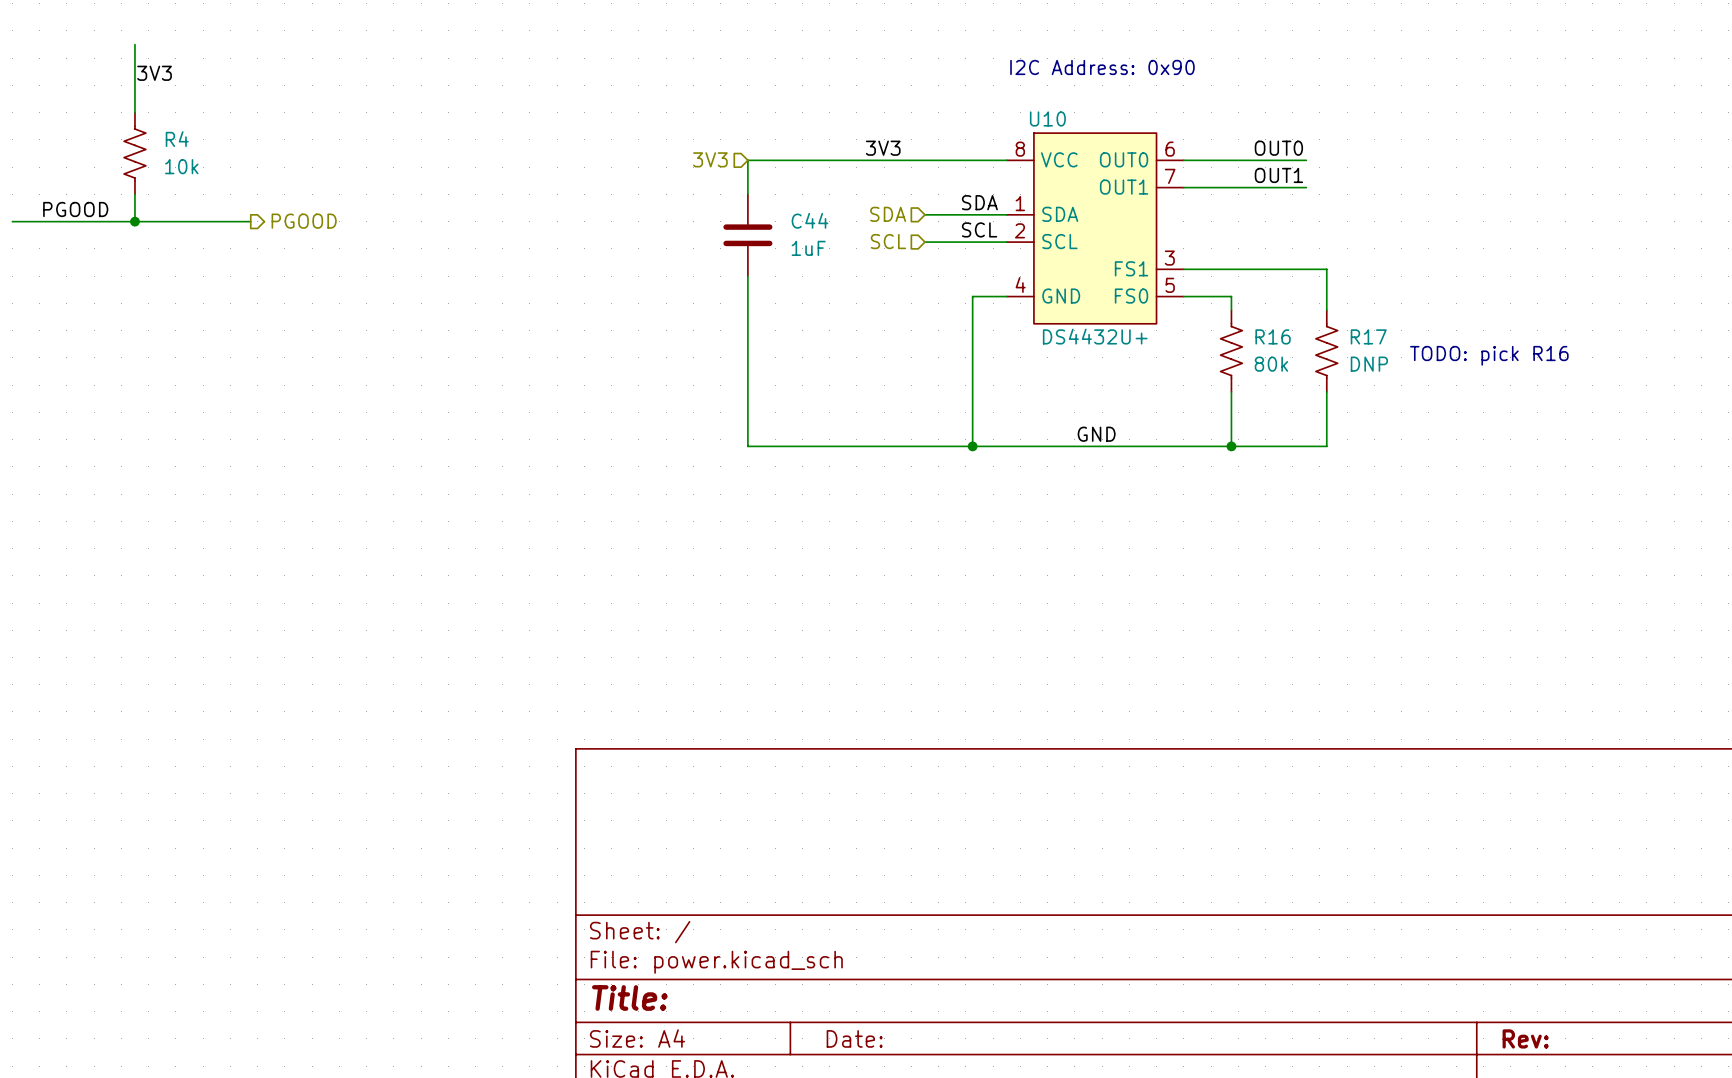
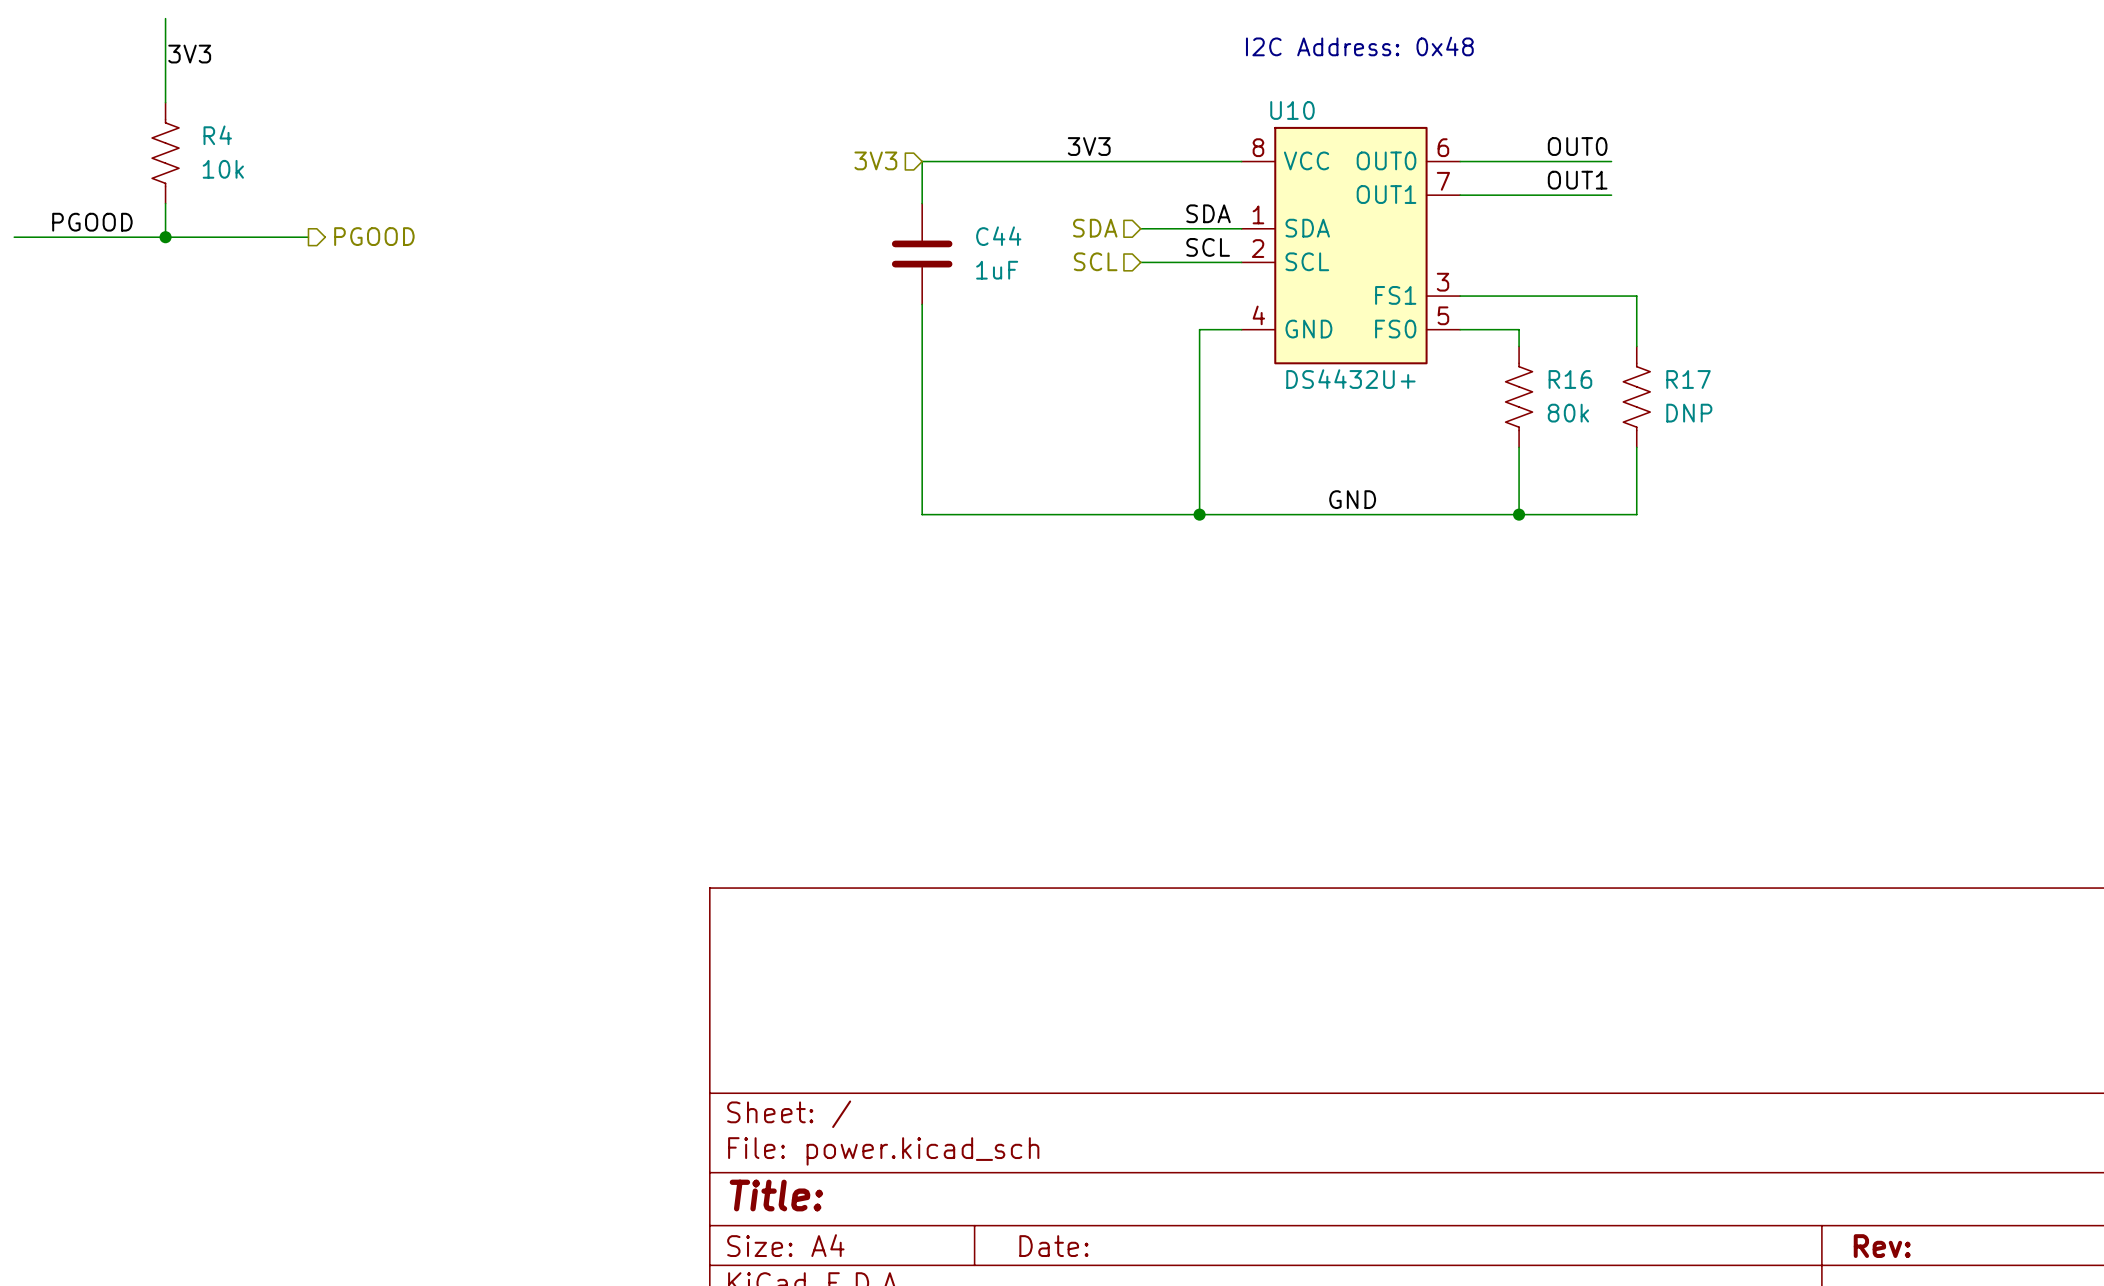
text: I2C Address: 0x90 (1102, 67) -> I2C Address: 0x48 (1359, 46)
text: TODO: pick R16 (1489, 355) -> none

